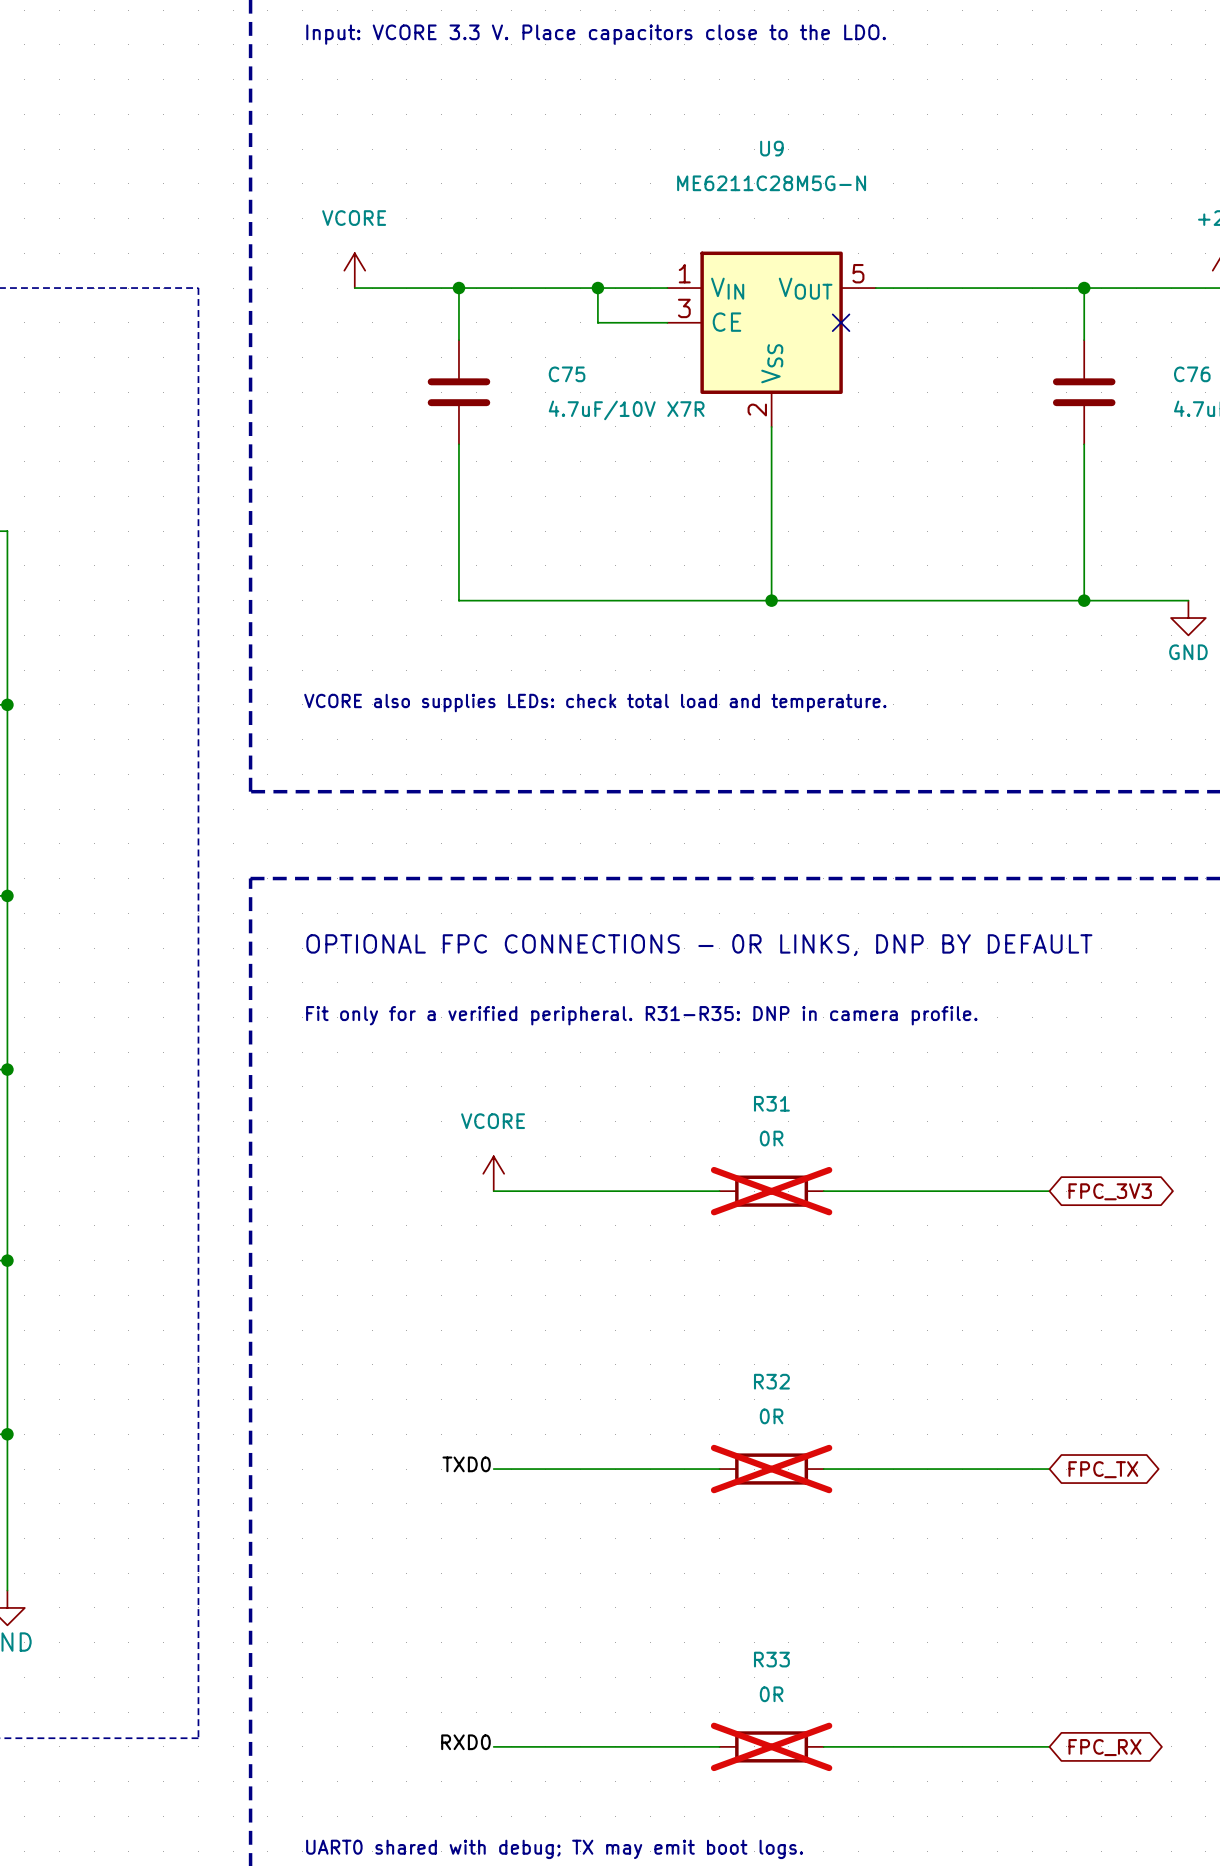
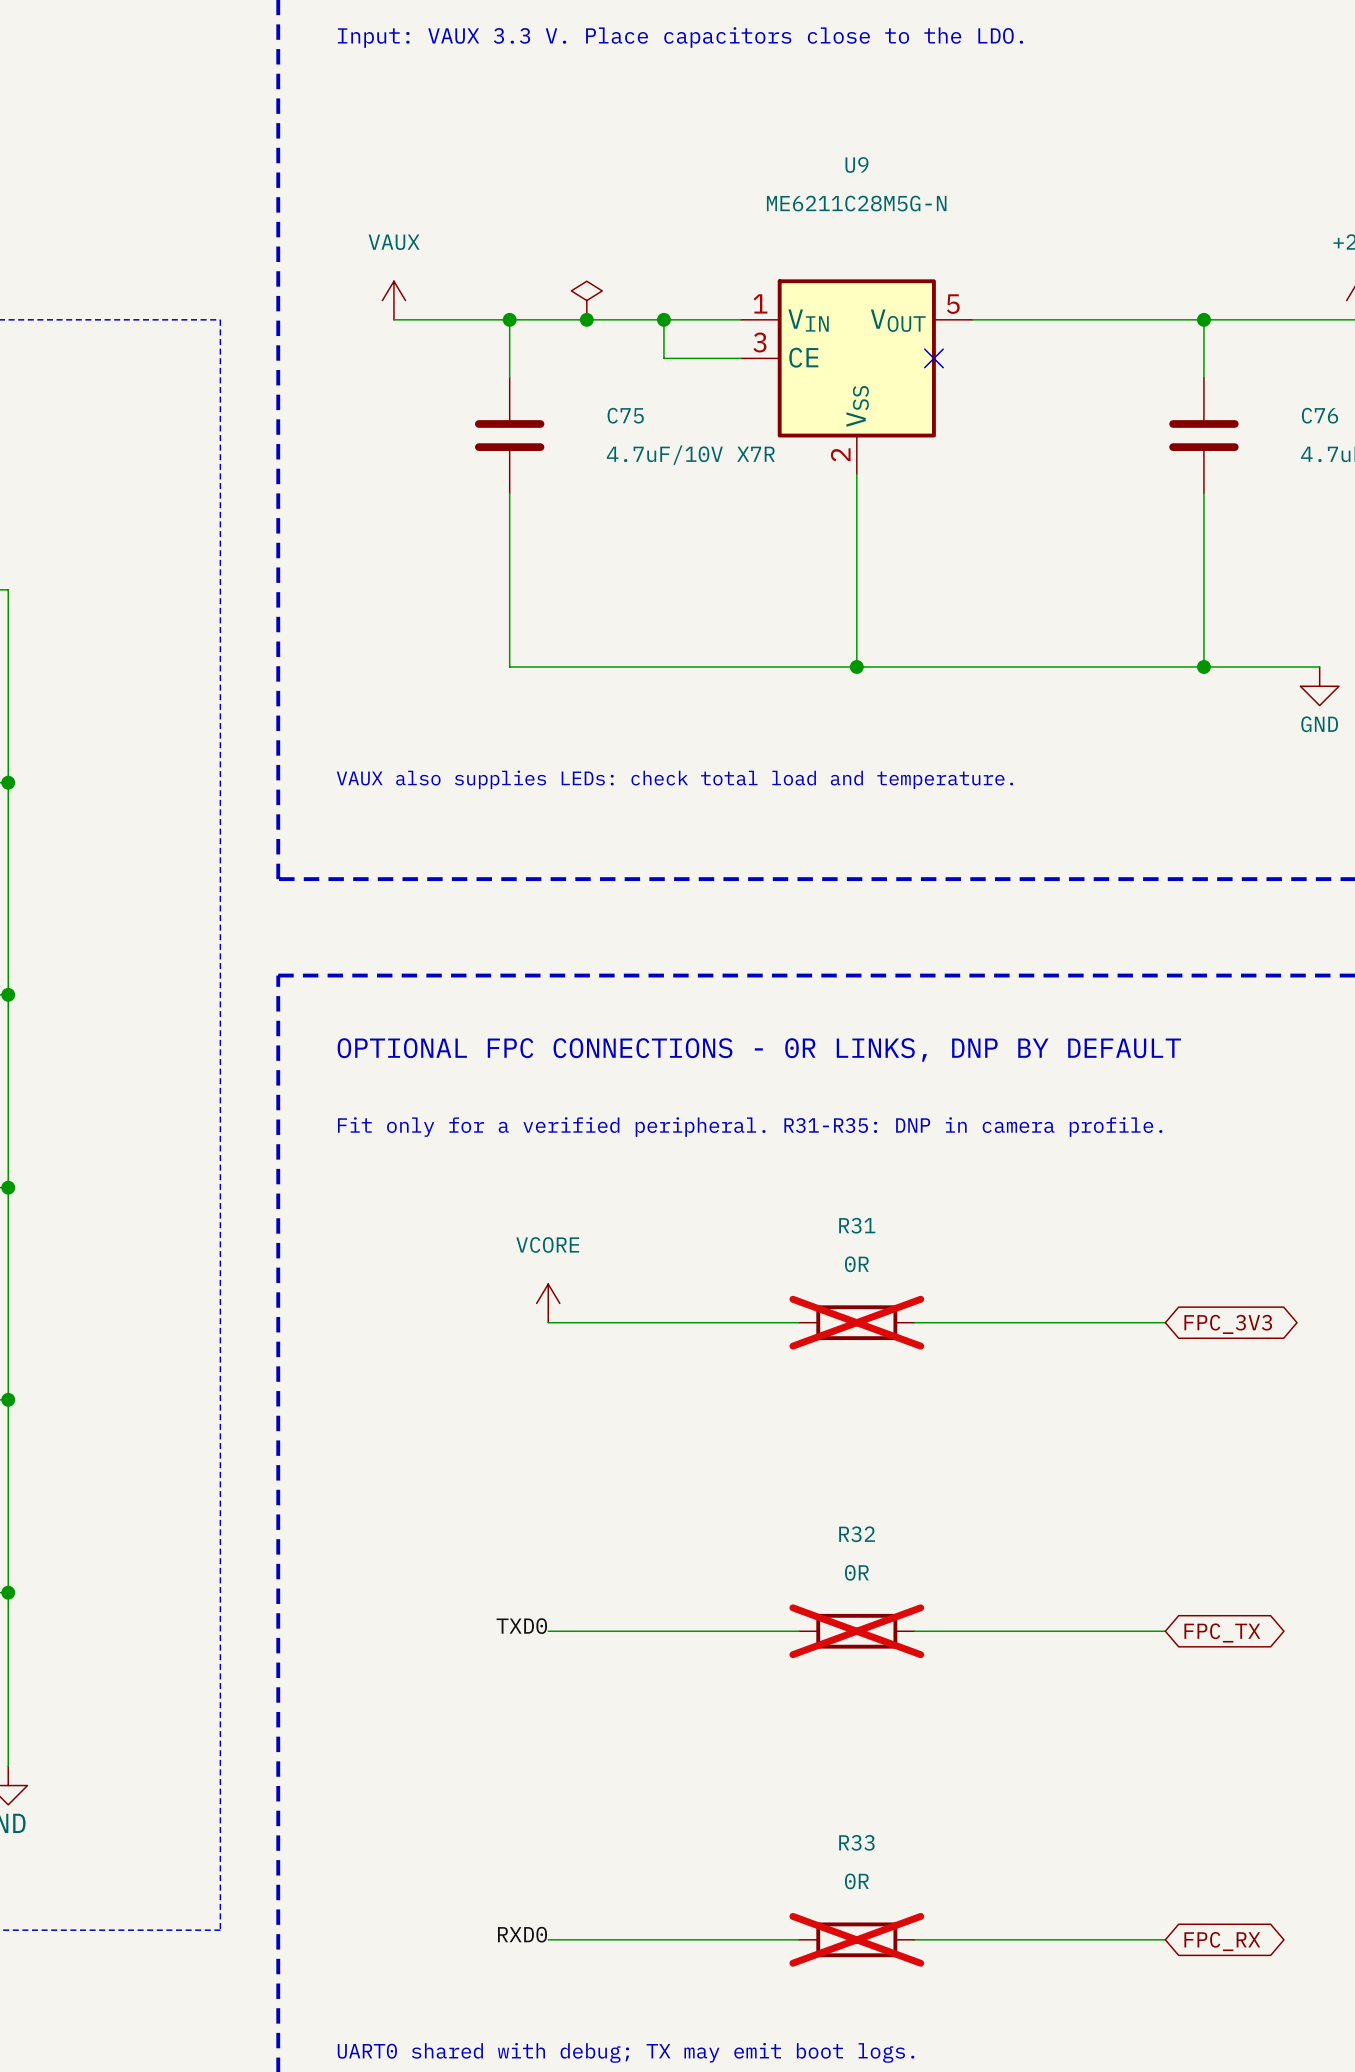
text: Input: VCORE 3.3 V. Place capacitors close to the LDO. (596, 34) -> Input: VAUX 3.3 V. Place capacitors close to the LDO. (680, 37)
power symbol: VCORE (354, 270) -> VAUX (393, 300)
power symbol: none -> (586, 300)
junction: none -> (586, 319)
text: VCORE also supplies LEDs: check total load and temperature. (595, 703) -> VAUX also supplies LEDs: check total load and temperature. (674, 779)

